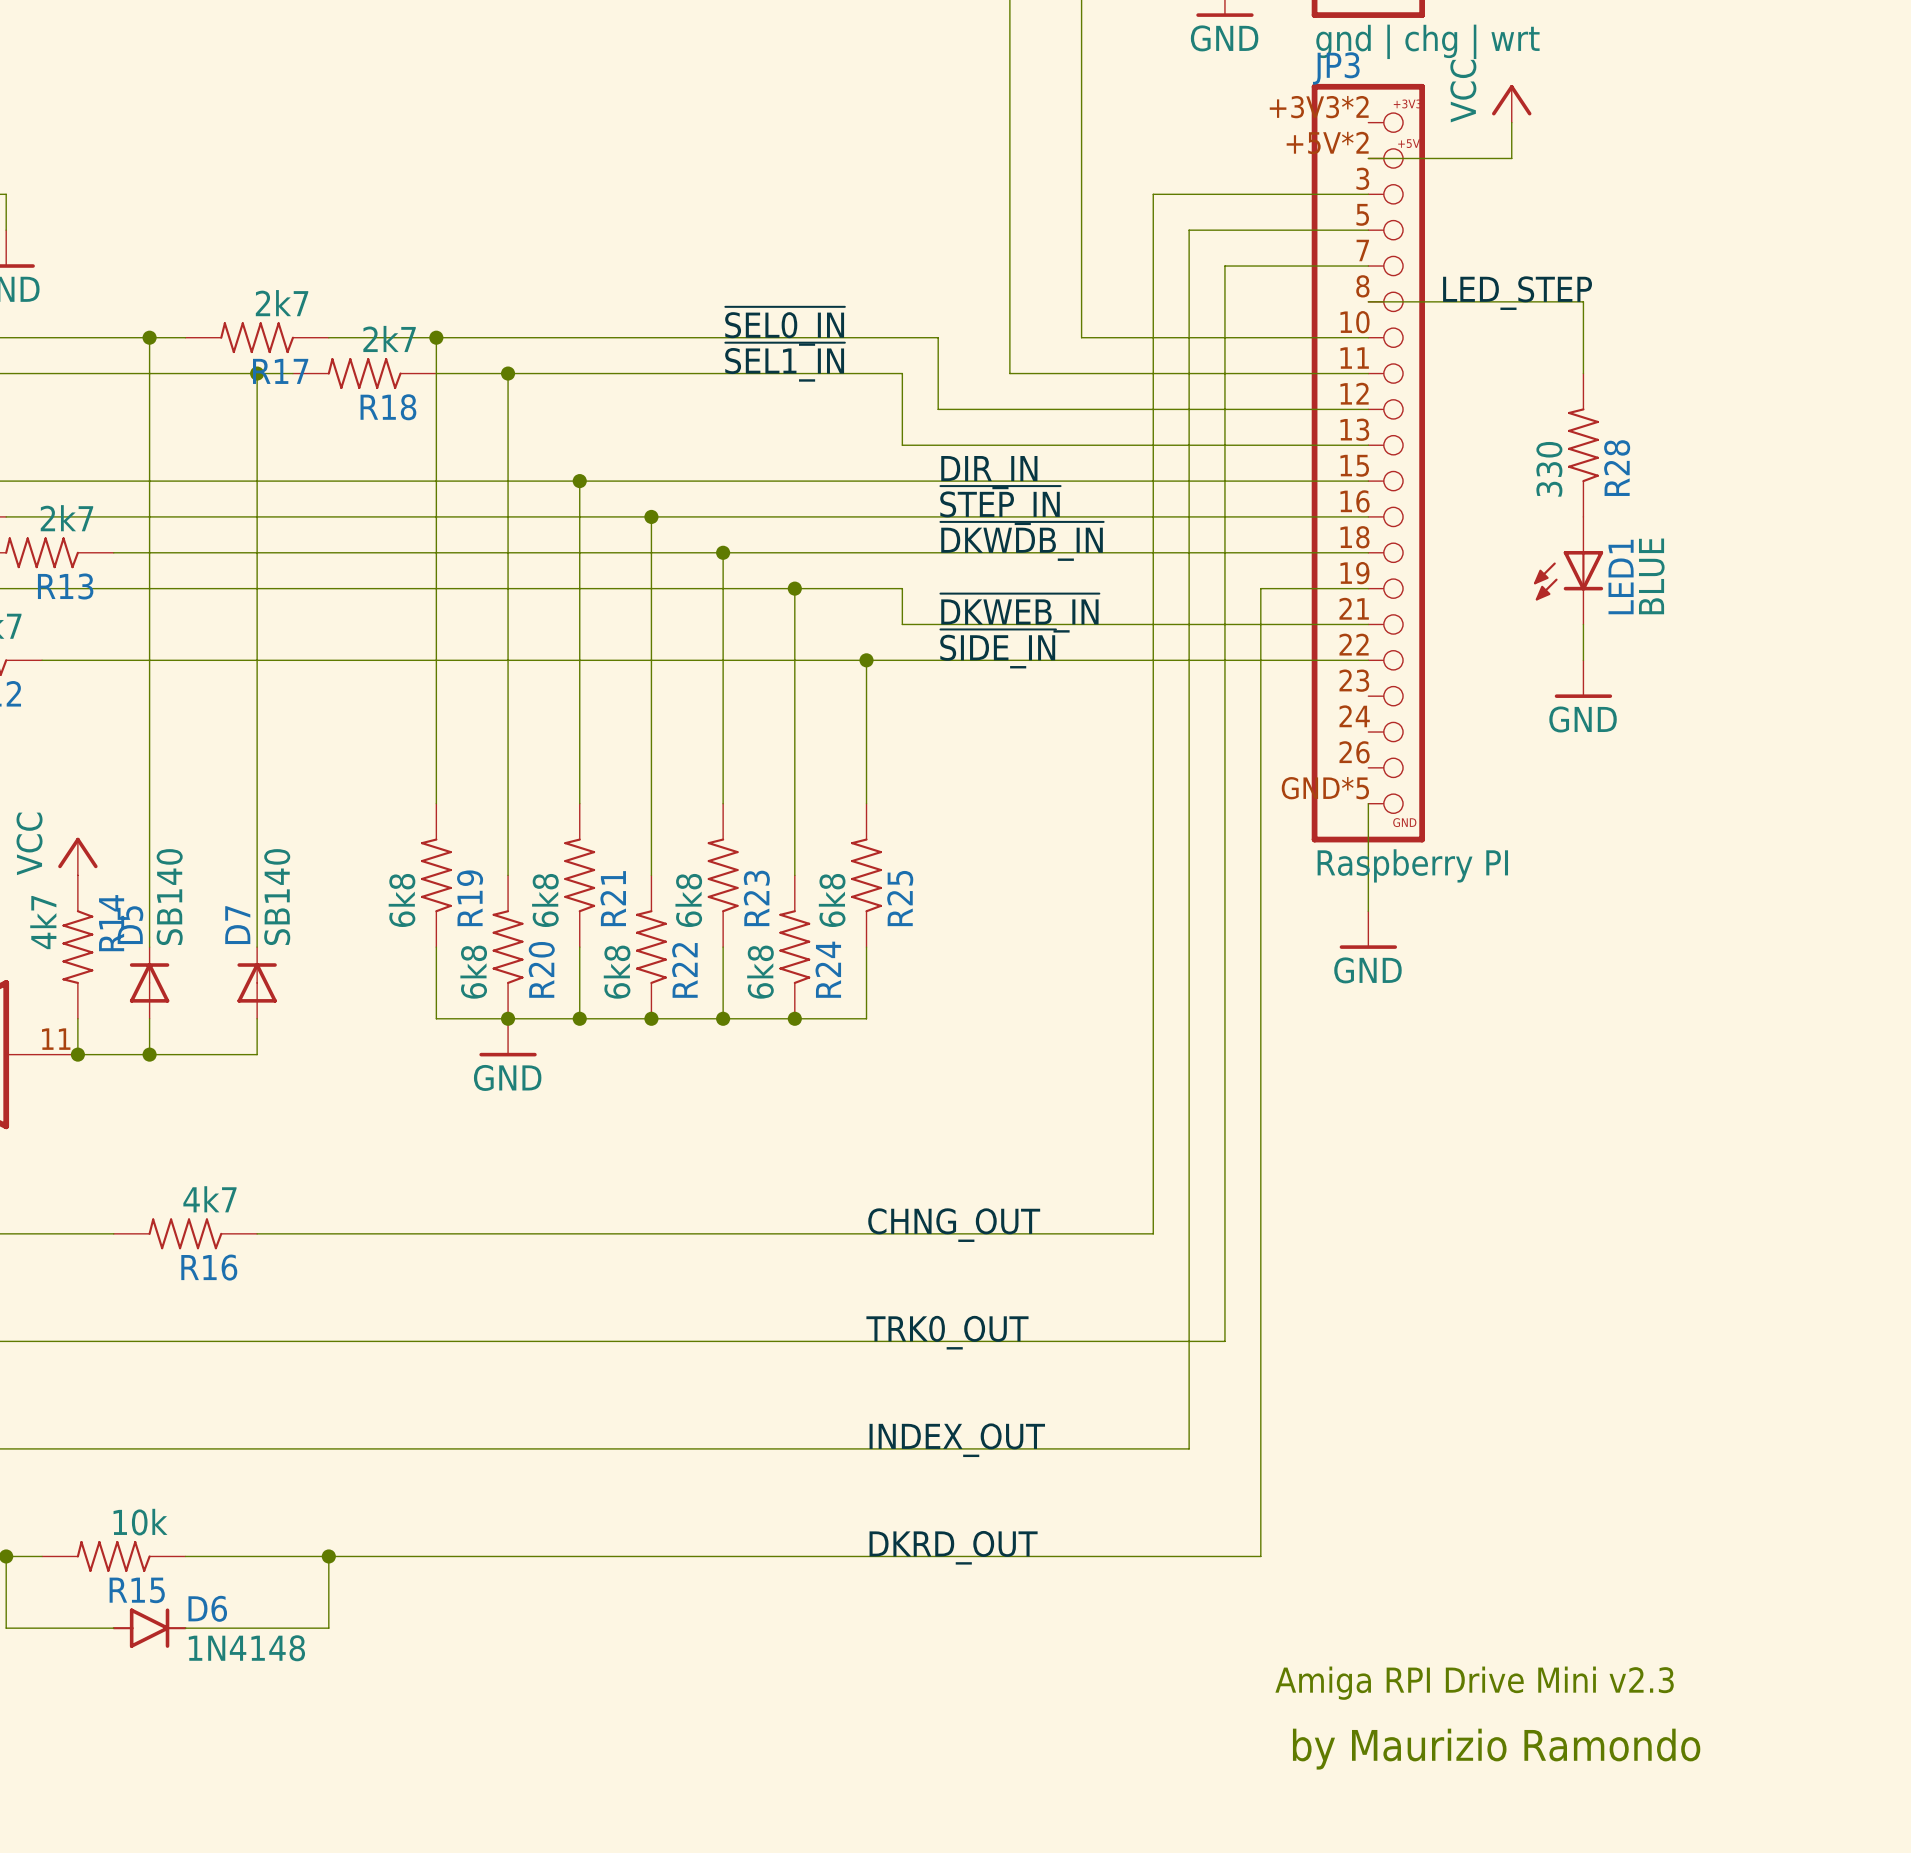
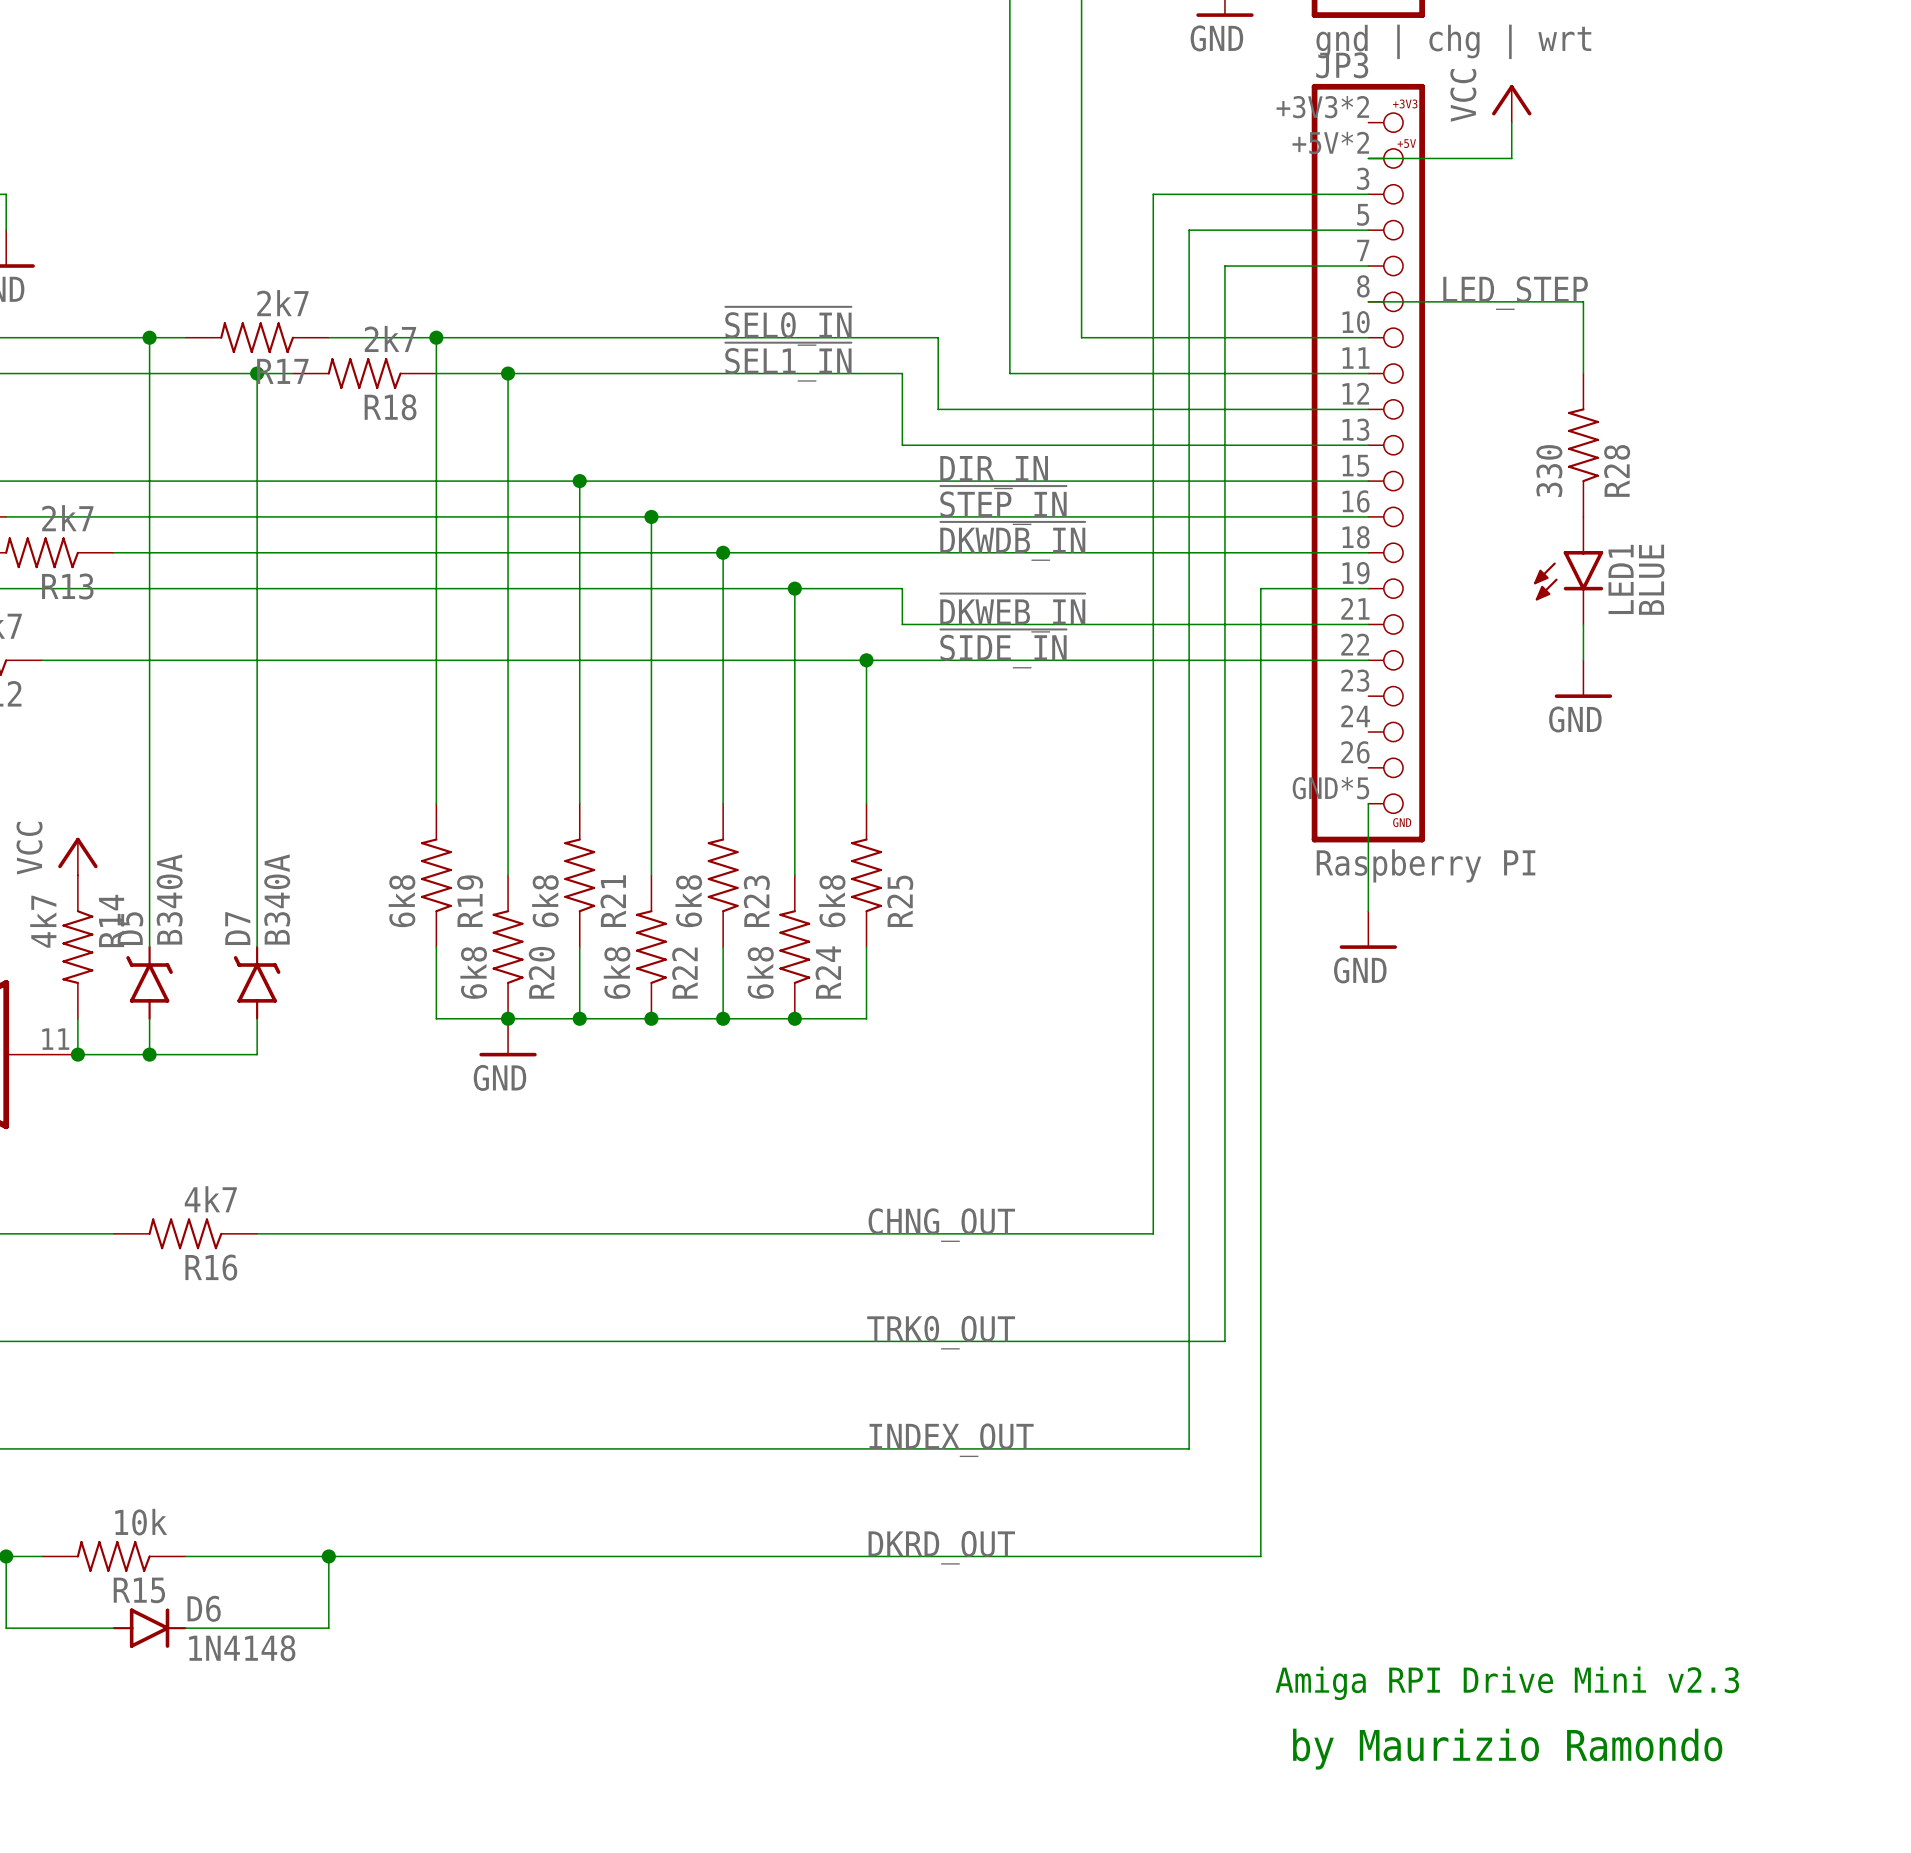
LED1 symbol: [1533, 516, 1604, 625] -> [1533, 516, 1604, 625]
D5 value: SB140 (169, 897) -> B340A (169, 899)
D7 value: SB140 (277, 897) -> B340A (277, 899)
D5 symbol: [129, 947, 170, 1019] -> [126, 946, 173, 1020]
D7 symbol: [237, 947, 277, 1019] -> [233, 946, 281, 1020]

